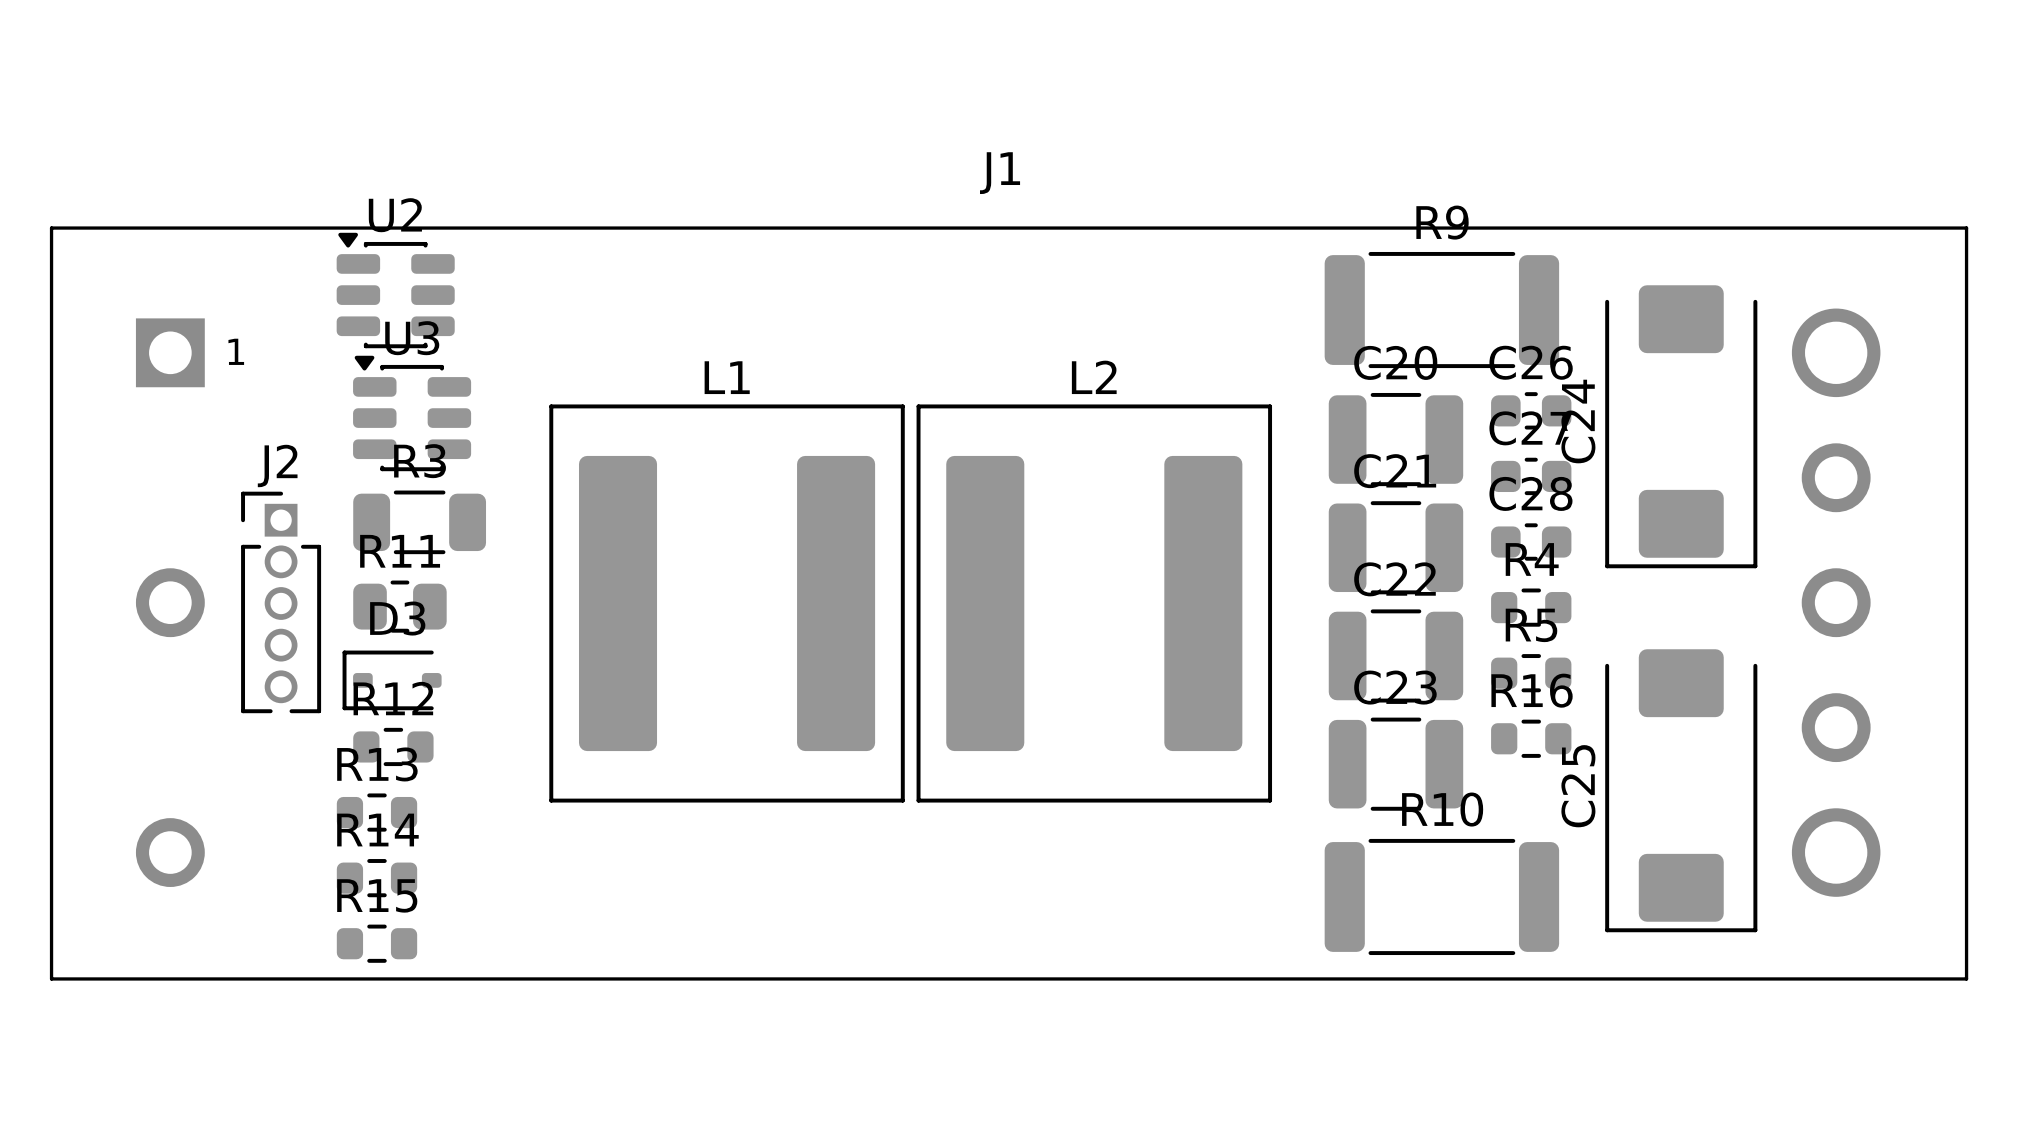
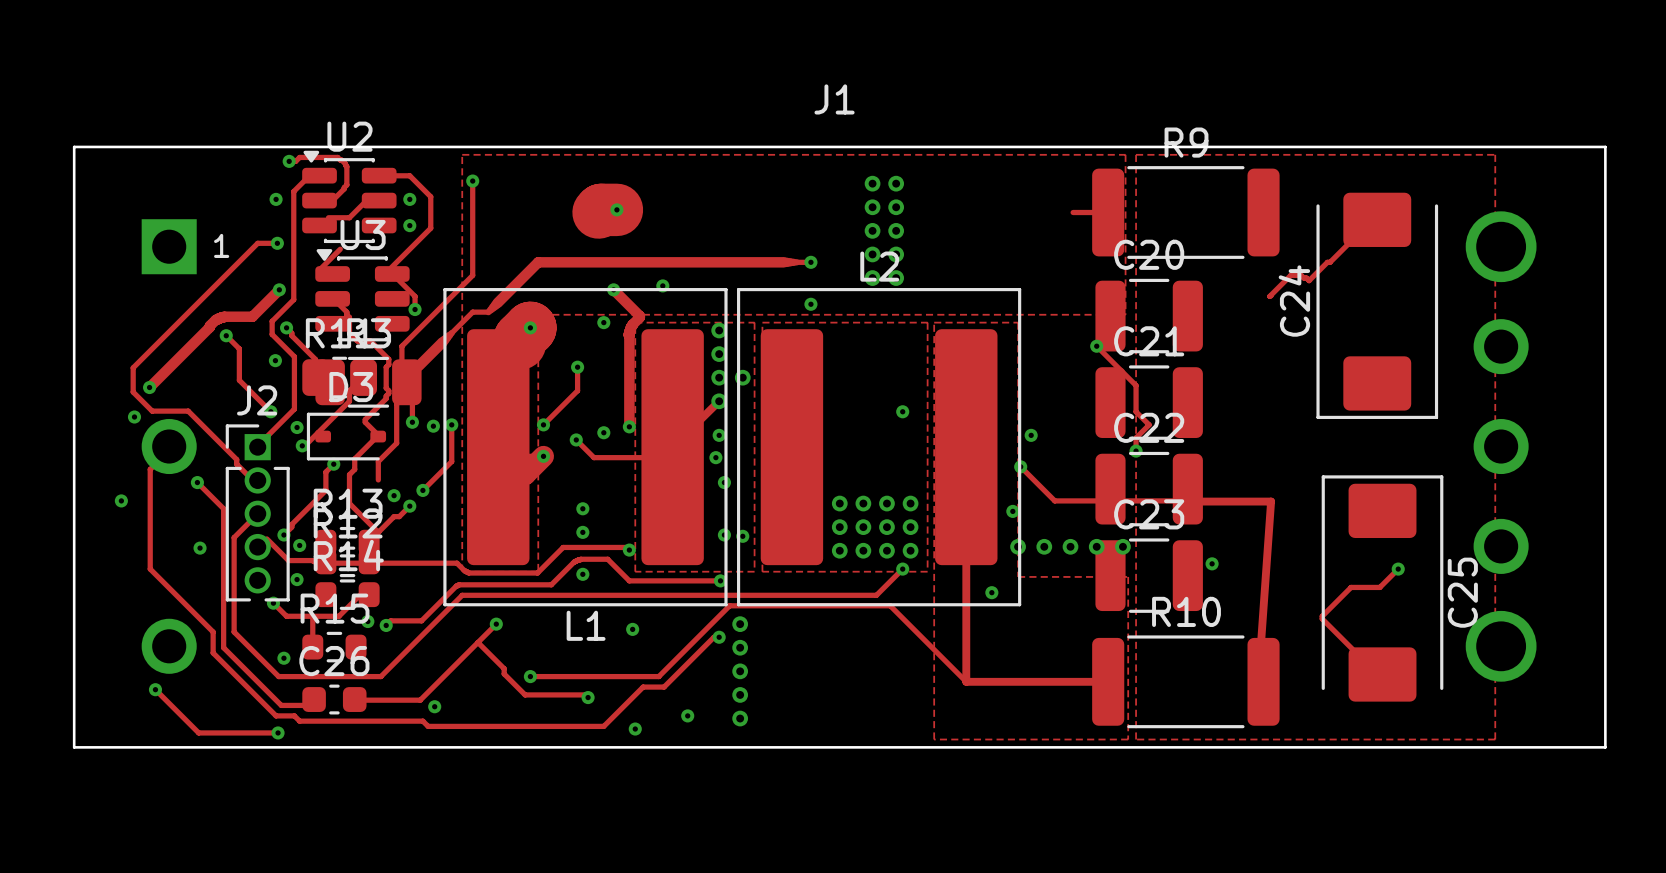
zone outline: none -> (462, 154) (1125, 154) (1125, 314) (538, 314) (538, 571) (462, 571) (462, 154)
zone outline: none -> (1136, 154) (1495, 154) (1495, 739) (1136, 739) (1136, 154)
track: none -> (289, 161) (295, 161) (299, 157) (337, 157) (345, 164) (346, 184) (344, 188) (332, 200) (319, 200)
via: none -> (289, 161)
track: none -> (309, 175) (293, 191) (293, 299) (272, 321) (272, 334) (294, 356) (294, 409) (257, 445)
track: none -> (378, 175) (409, 175) (430, 196) (430, 228) (391, 267)
track: none -> (472, 181) (472, 275) (401, 346) (401, 367) (396, 372) (396, 377) (401, 382) (401, 398) (396, 403) (396, 443) (378, 461) (378, 479)
via: none -> (472, 181)
via: none -> (872, 183)
via: none -> (896, 183)
via: none -> (276, 199)
track: none -> (367, 199) (349, 217) (328, 217)
via: none -> (409, 199)
via: none -> (872, 207)
via: none -> (896, 207)
track: none -> (616, 209) (601, 209) (598, 212)
via: none -> (616, 209)
track: none -> (1073, 212) (1102, 212)
track: none -> (1382, 220) (1372, 220) (1309, 280) (1301, 275) (1290, 275) (1271, 295)
via: none -> (409, 225)
via: none -> (872, 230)
via: none -> (896, 230)
track: none -> (277, 243) (257, 243) (133, 367) (133, 392) (152, 411) (188, 411) (236, 459) (236, 464) (253, 480)
via: none -> (277, 243)
track: none -> (340, 249) (319, 270)
via: none -> (872, 254)
via: none -> (896, 254)
track: none -> (810, 262) (538, 262) (488, 312) (472, 312) (409, 375) (412, 377) (412, 422)
via: none -> (810, 262)
L1 name position: L1 (727, 377) -> L1 (586, 625)
track: none -> (391, 272) (415, 296) (415, 309)
via: none -> (872, 278)
via: none -> (896, 278)
via: none -> (662, 285)
track: none -> (279, 289) (252, 316) (224, 316) (215, 320) (149, 387)
via: none -> (279, 289)
track: none -> (613, 289) (639, 316) (631, 326) (628, 334) (629, 426)
via: none -> (613, 289)
C26 position: (1531, 410) -> (334, 699)
track: none -> (319, 298) (333, 299) (349, 317) (349, 333) (362, 343) (370, 340) (388, 359) (388, 364) (386, 367) (386, 388) (388, 393) (386, 398) (365, 419) (365, 422) (378, 435)
via: none -> (810, 304)
via: none -> (415, 309)
via: none -> (603, 322)
zone outline: none -> (635, 322) (754, 322) (754, 571) (635, 571) (635, 322)
zone outline: none -> (762, 322) (927, 322) (927, 571) (762, 571) (762, 322)
zone outline: none -> (934, 322) (1018, 322) (1018, 576) (1128, 576) (1128, 739) (934, 739) (934, 322)
track: none -> (286, 327) (315, 359) (315, 377)
via: none -> (286, 327)
via: none -> (530, 327)
track: none -> (529, 329) (530, 327) (519, 338) (519, 343)
via: none -> (719, 330)
track: none -> (226, 335) (239, 348) (239, 380) (270, 411)
via: none -> (226, 335)
C27: (1531, 476) -> none
track: none -> (1096, 346) (1136, 385) (1136, 411) (1149, 424) (1136, 437) (1136, 451)
via: none -> (1096, 346)
via: none -> (719, 354)
via: none -> (275, 360)
track: none -> (577, 367) (577, 390) (543, 424)
via: none -> (577, 367)
track: none -> (362, 377) (349, 390) (349, 401) (304, 445)
via: none -> (719, 377)
via: none -> (742, 377)
via: none -> (149, 387)
C28: (1531, 542) -> none
track: none -> (719, 401) (662, 457) (593, 457) (576, 439)
via: none -> (719, 401)
via: none -> (270, 411)
via: none -> (902, 411)
via: none -> (134, 417)
via: none -> (412, 422)
track: none -> (451, 424) (451, 461) (422, 490)
via: none -> (451, 424)
via: none -> (543, 424)
via: none -> (433, 426)
via: none -> (297, 427)
via: none -> (629, 426)
via: none -> (603, 432)
track: none -> (378, 435) (354, 458) (354, 469) (349, 474) (349, 503) (378, 532)
via: none -> (719, 435)
via: none -> (1031, 435)
via: none -> (576, 439)
via: none -> (302, 445)
J2 position: (281, 602) -> (257, 512)
track: none -> (173, 447) (150, 469) (150, 569) (213, 632) (213, 652) (276, 715) (294, 715) (299, 721) (422, 721) (428, 726) (603, 726) (643, 687) (664, 687) (713, 637) (719, 637)
L1 position: (727, 603) -> (585, 447)
L2 position: (1094, 603) -> (879, 447)
track: none -> (966, 447) (966, 681)
R11 position: (399, 606) -> (339, 377)
R4: (1531, 607) -> none
via: none -> (1136, 451)
track: none -> (525, 456) (543, 456) (525, 474) (519, 474)
via: none -> (543, 456)
via: none -> (715, 457)
track: none -> (333, 464) (325, 472) (325, 490) (283, 535)
via: none -> (333, 464)
track: none -> (1020, 466) (1054, 500) (1271, 501) (1258, 681)
via: none -> (1020, 466)
track: none -> (197, 482) (223, 508) (223, 647) (281, 705) (310, 705)
via: none -> (197, 482)
via: none -> (724, 482)
via: none -> (422, 490)
via: none -> (394, 495)
via: none -> (121, 500)
R5: (1531, 673) -> none
via: none -> (839, 503)
via: none -> (863, 503)
via: none -> (886, 503)
via: none -> (910, 503)
track: none -> (409, 506) (399, 516) (394, 516) (369, 542)
via: none -> (409, 506)
D3 position: (392, 680) -> (346, 436)
via: none -> (582, 508)
via: none -> (1012, 511)
track: none -> (257, 514) (234, 537) (234, 632) (278, 676) (380, 676) (462, 595) (876, 595) (902, 569)
via: none -> (839, 527)
via: none -> (863, 527)
via: none -> (886, 527)
via: none -> (910, 527)
via: none -> (582, 532)
via: none -> (283, 535)
via: none -> (724, 535)
via: none -> (742, 536)
track: none -> (266, 538) (288, 560) (312, 560) (318, 563) (456, 563) (468, 573) (537, 573) (563, 547) (626, 547)
via: none -> (299, 545)
via: none -> (1018, 546)
via: none -> (1044, 546)
via: none -> (1070, 546)
via: none -> (1096, 546)
via: none -> (1122, 546)
via: none -> (200, 548)
via: none -> (629, 550)
via: none -> (839, 550)
via: none -> (863, 550)
via: none -> (886, 550)
via: none -> (910, 550)
R16: (1531, 738) -> none
via: none -> (1212, 563)
via: none -> (902, 569)
track: none -> (1398, 569) (1379, 587) (1351, 587) (1322, 616) (1322, 618) (1377, 673) (1382, 674)
via: none -> (1398, 569)
via: none -> (582, 574)
via: none -> (297, 579)
track: none -> (720, 580) (629, 580) (607, 559) (580, 559) (574, 561) (551, 584) (458, 584) (421, 620) (390, 620) (386, 625)
via: none -> (720, 580)
via: none -> (991, 592)
track: none -> (359, 595) (339, 616) (286, 616) (273, 603)
C25 rotation: 0° (1681, 790) -> 180° (1382, 588)
via: none -> (273, 603)
R13 position: (376, 812) -> (347, 542)
track: none -> (312, 616) (312, 647)
via: none -> (367, 621)
track: none -> (496, 624) (420, 700) (354, 699)
via: none -> (496, 624)
via: none -> (740, 624)
via: none -> (386, 625)
via: none -> (632, 629)
via: none -> (719, 637)
track: none -> (477, 642) (504, 668) (504, 673) (525, 694) (585, 694) (588, 697)
via: none -> (740, 647)
via: none -> (283, 658)
R14 position: (376, 878) -> (347, 594)
via: none -> (740, 671)
track: none -> (530, 676) (658, 676) (729, 605) (890, 605) (966, 681)
via: none -> (530, 676)
track: none -> (966, 681) (1102, 681)
track: none -> (155, 689) (198, 732) (278, 732)
via: none -> (155, 689)
via: none -> (740, 694)
via: none -> (588, 697)
via: none -> (434, 706)
via: none -> (687, 715)
via: none -> (740, 718)
R15 position: (376, 943) -> (334, 647)
via: none -> (635, 729)
via: none -> (278, 732)

